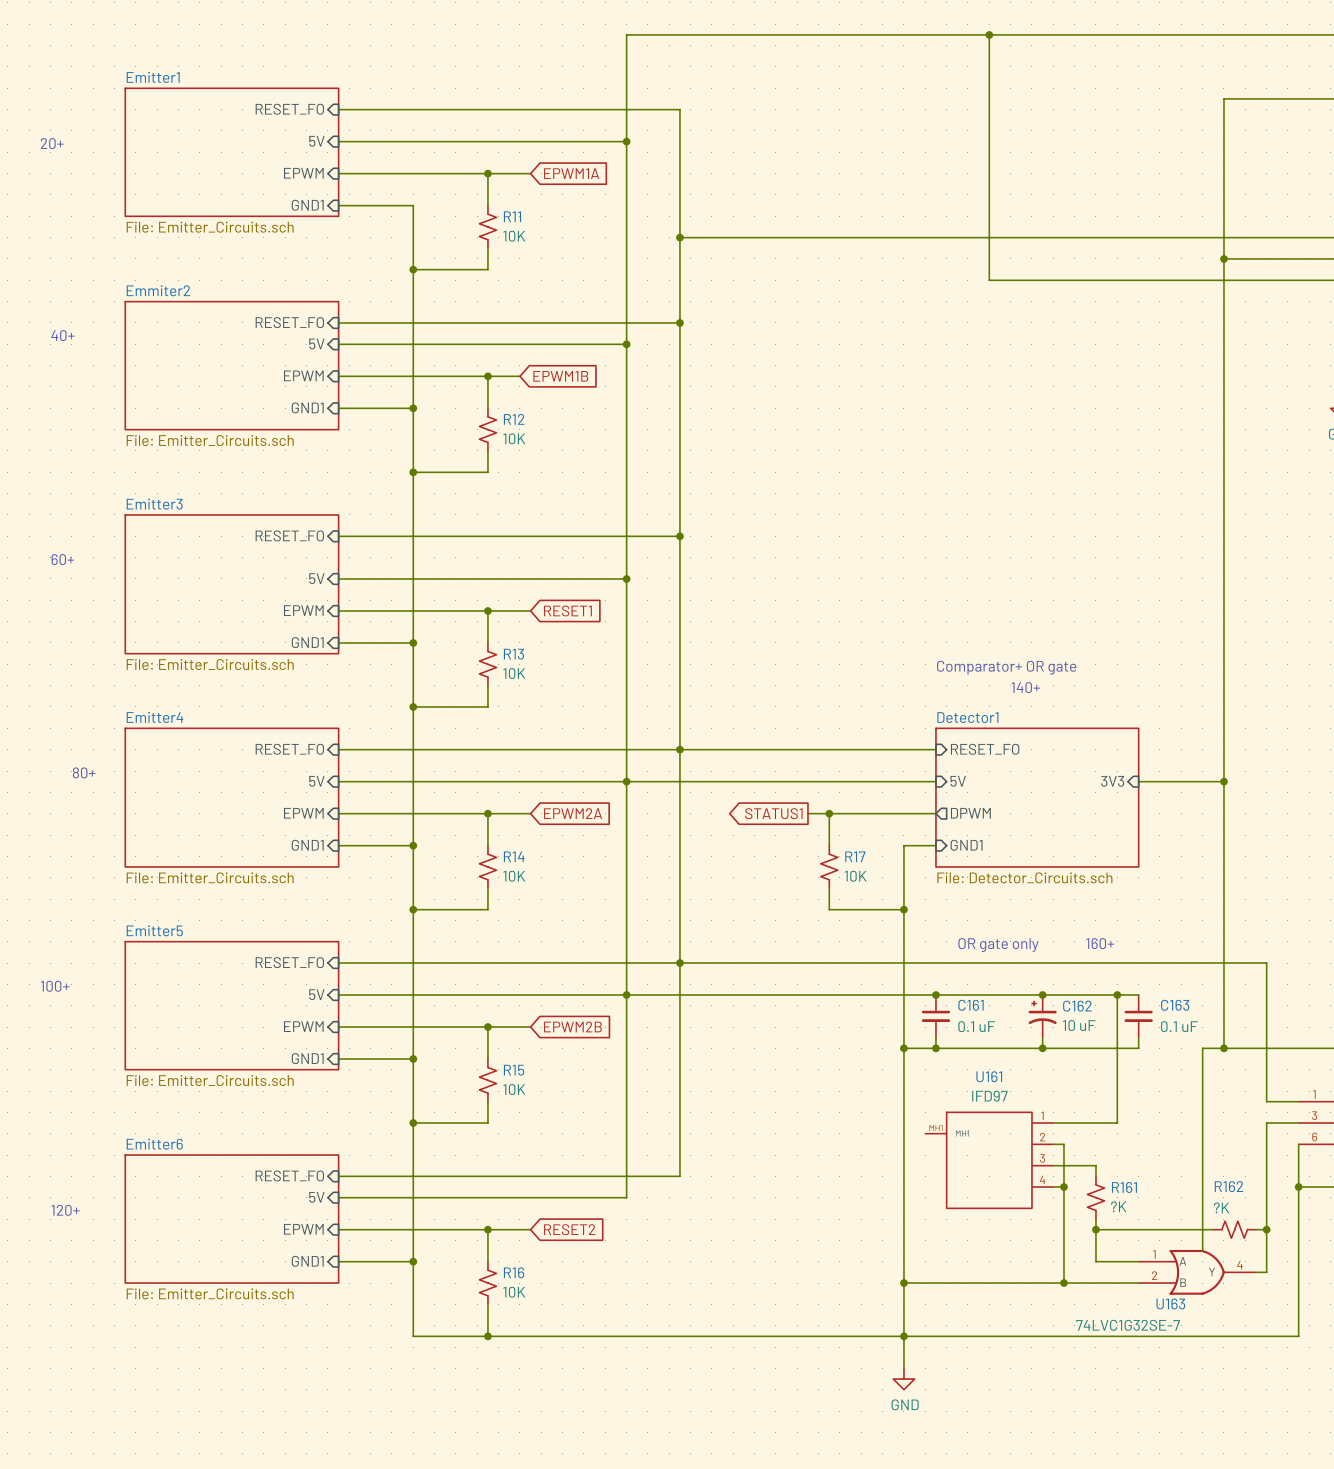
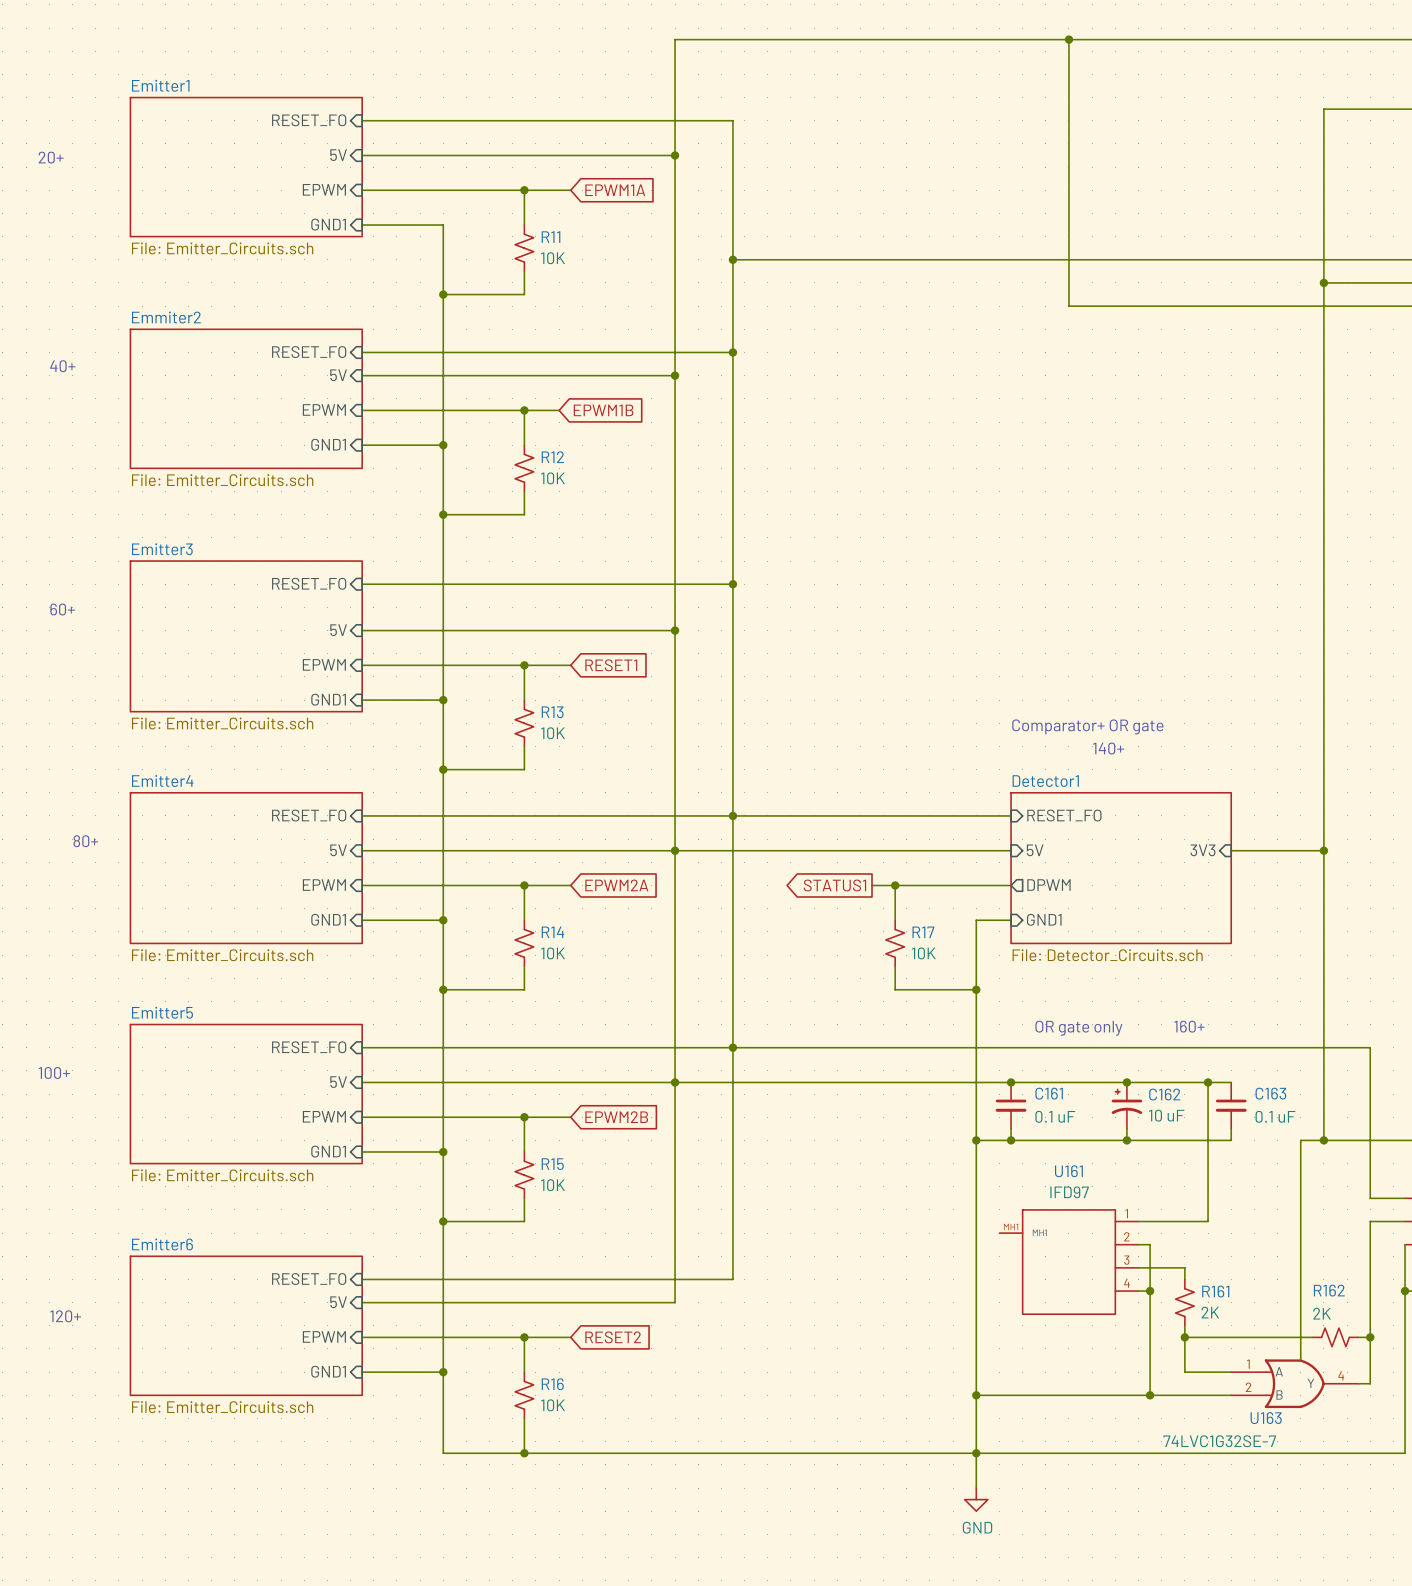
R161 value: ?K (1118, 1206) -> 2K (1210, 1312)
R162 value: ?K (1221, 1207) -> 2K (1322, 1313)

